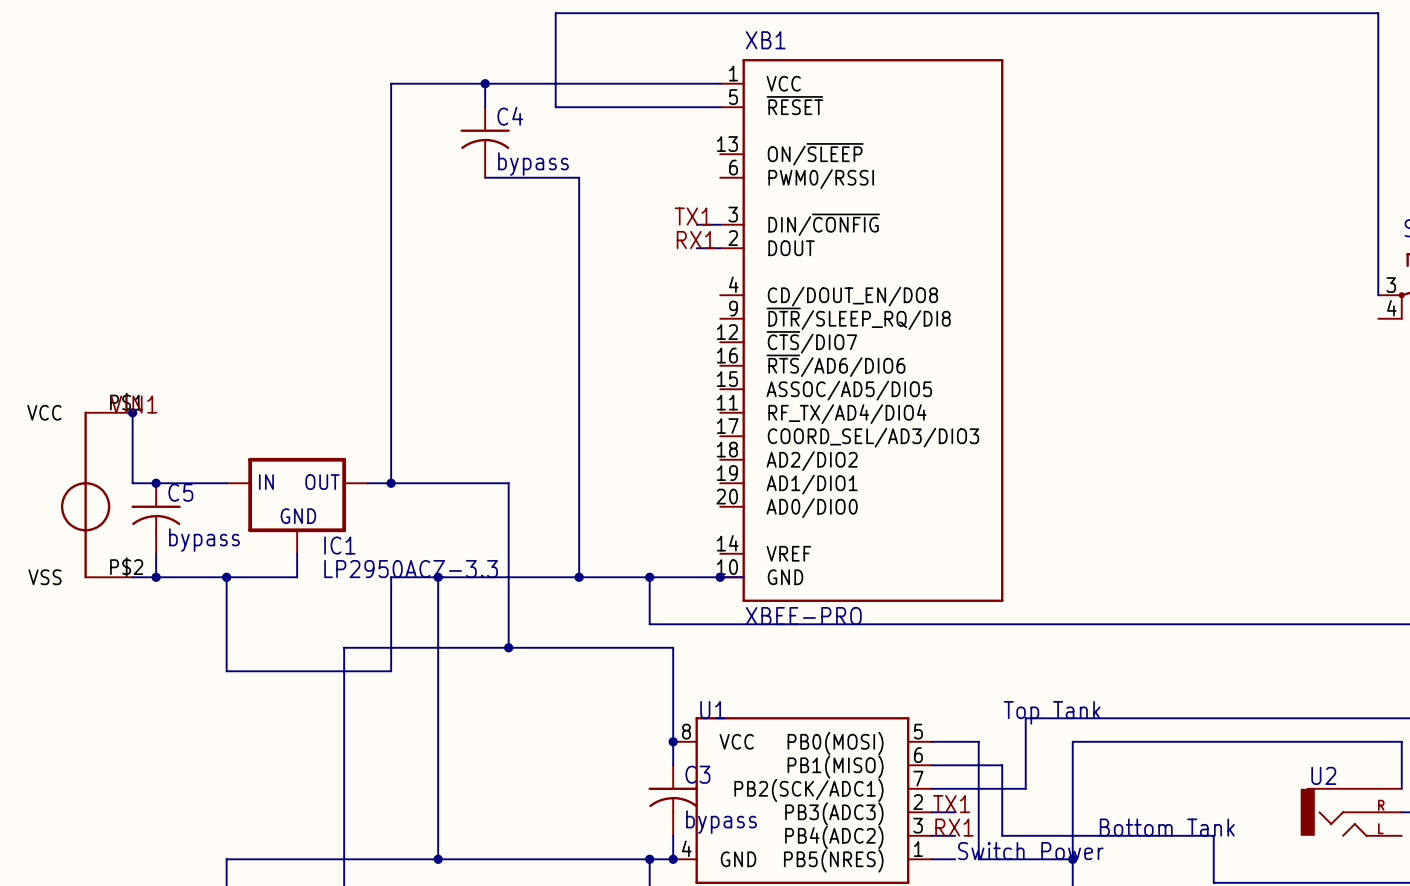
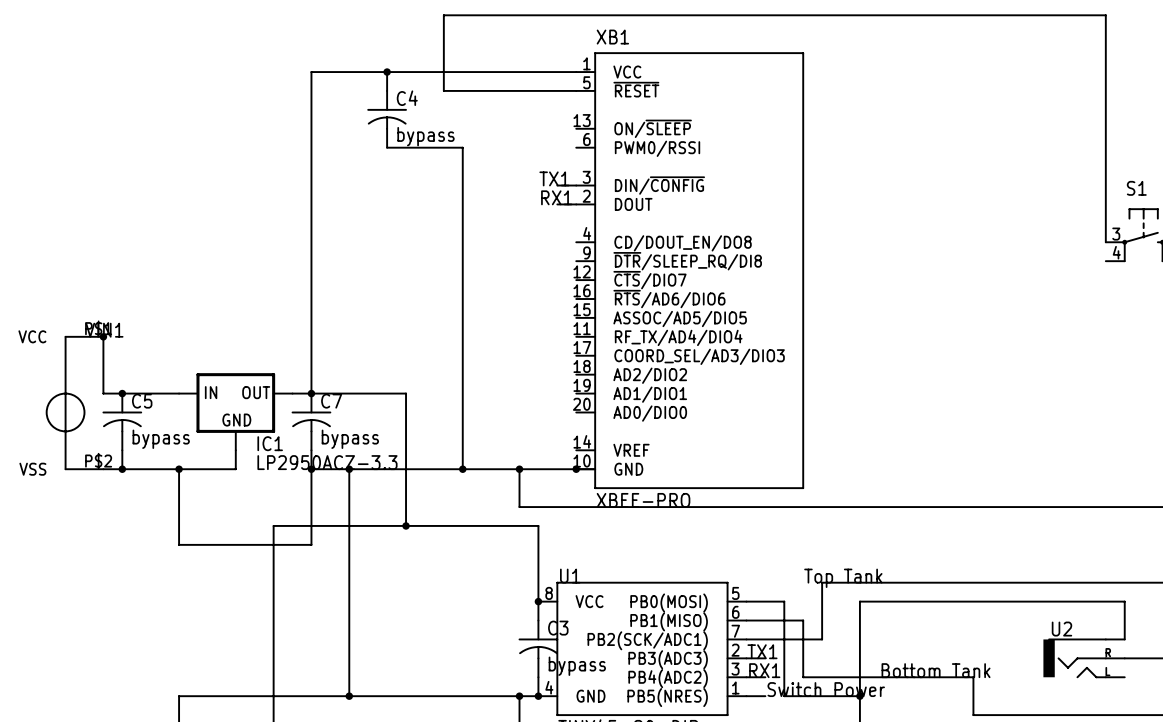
C7: none -> bypass (311, 421)
wire: none -> (311, 450) (311, 469)
junction: none -> (311, 469)

